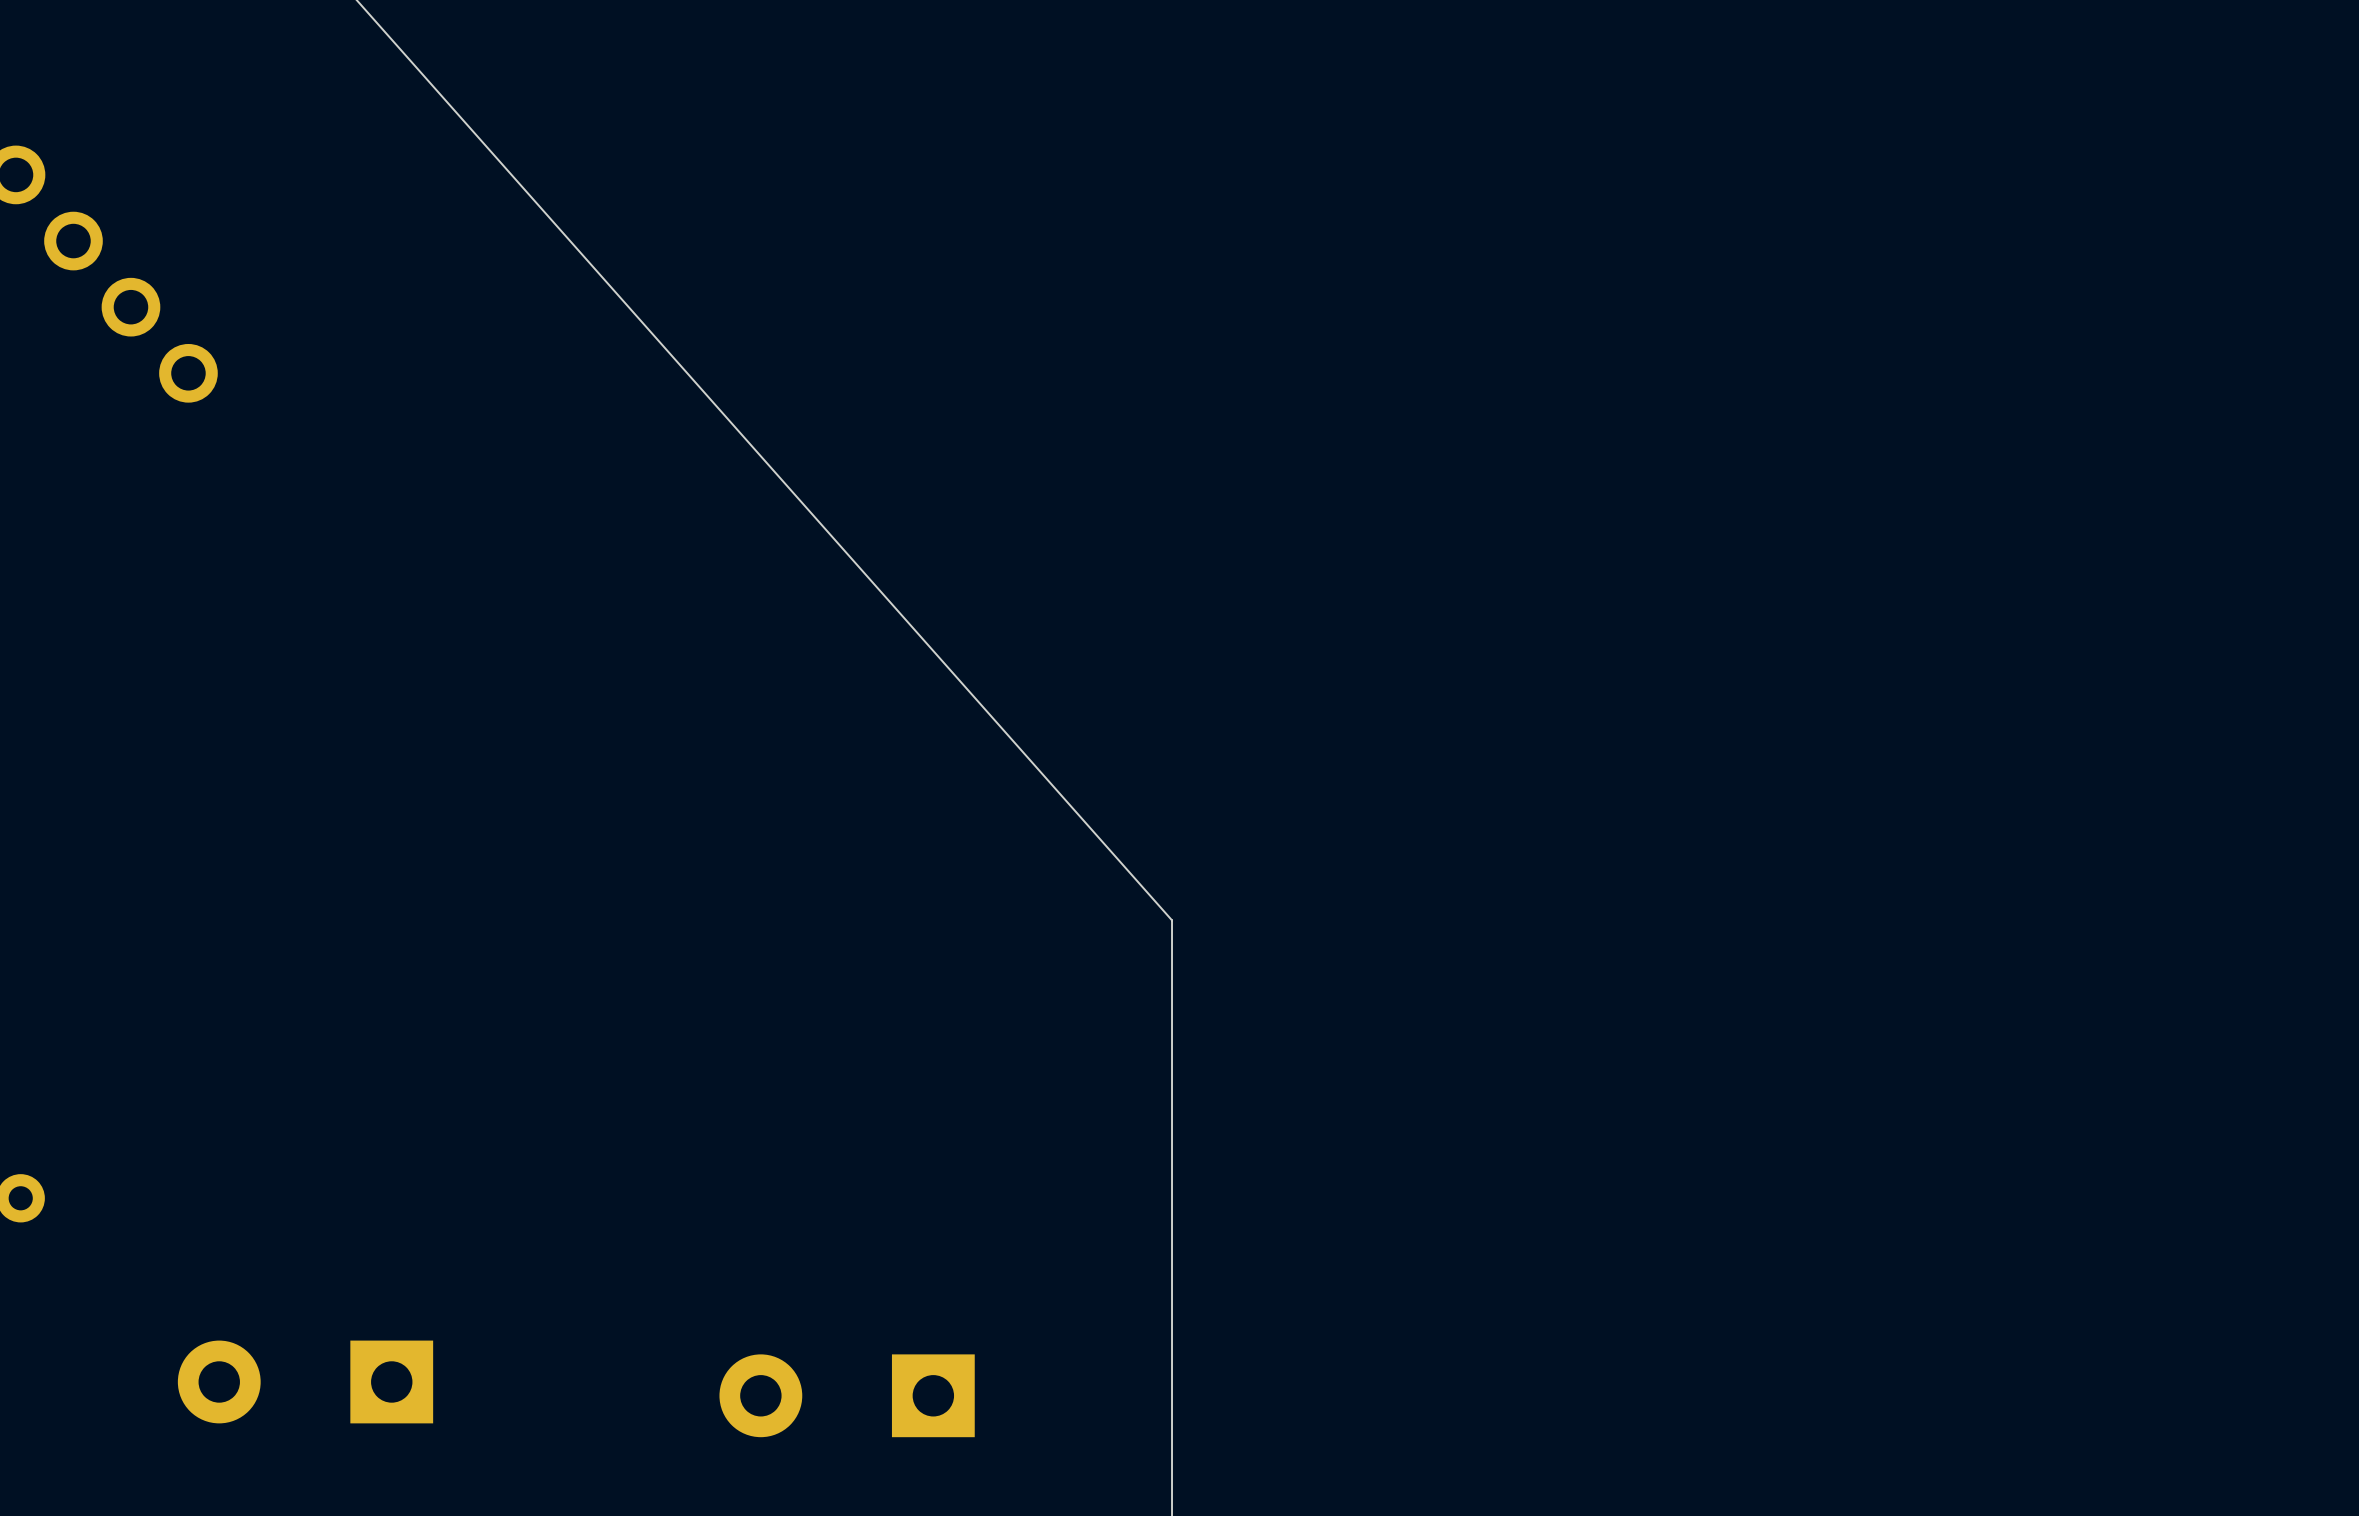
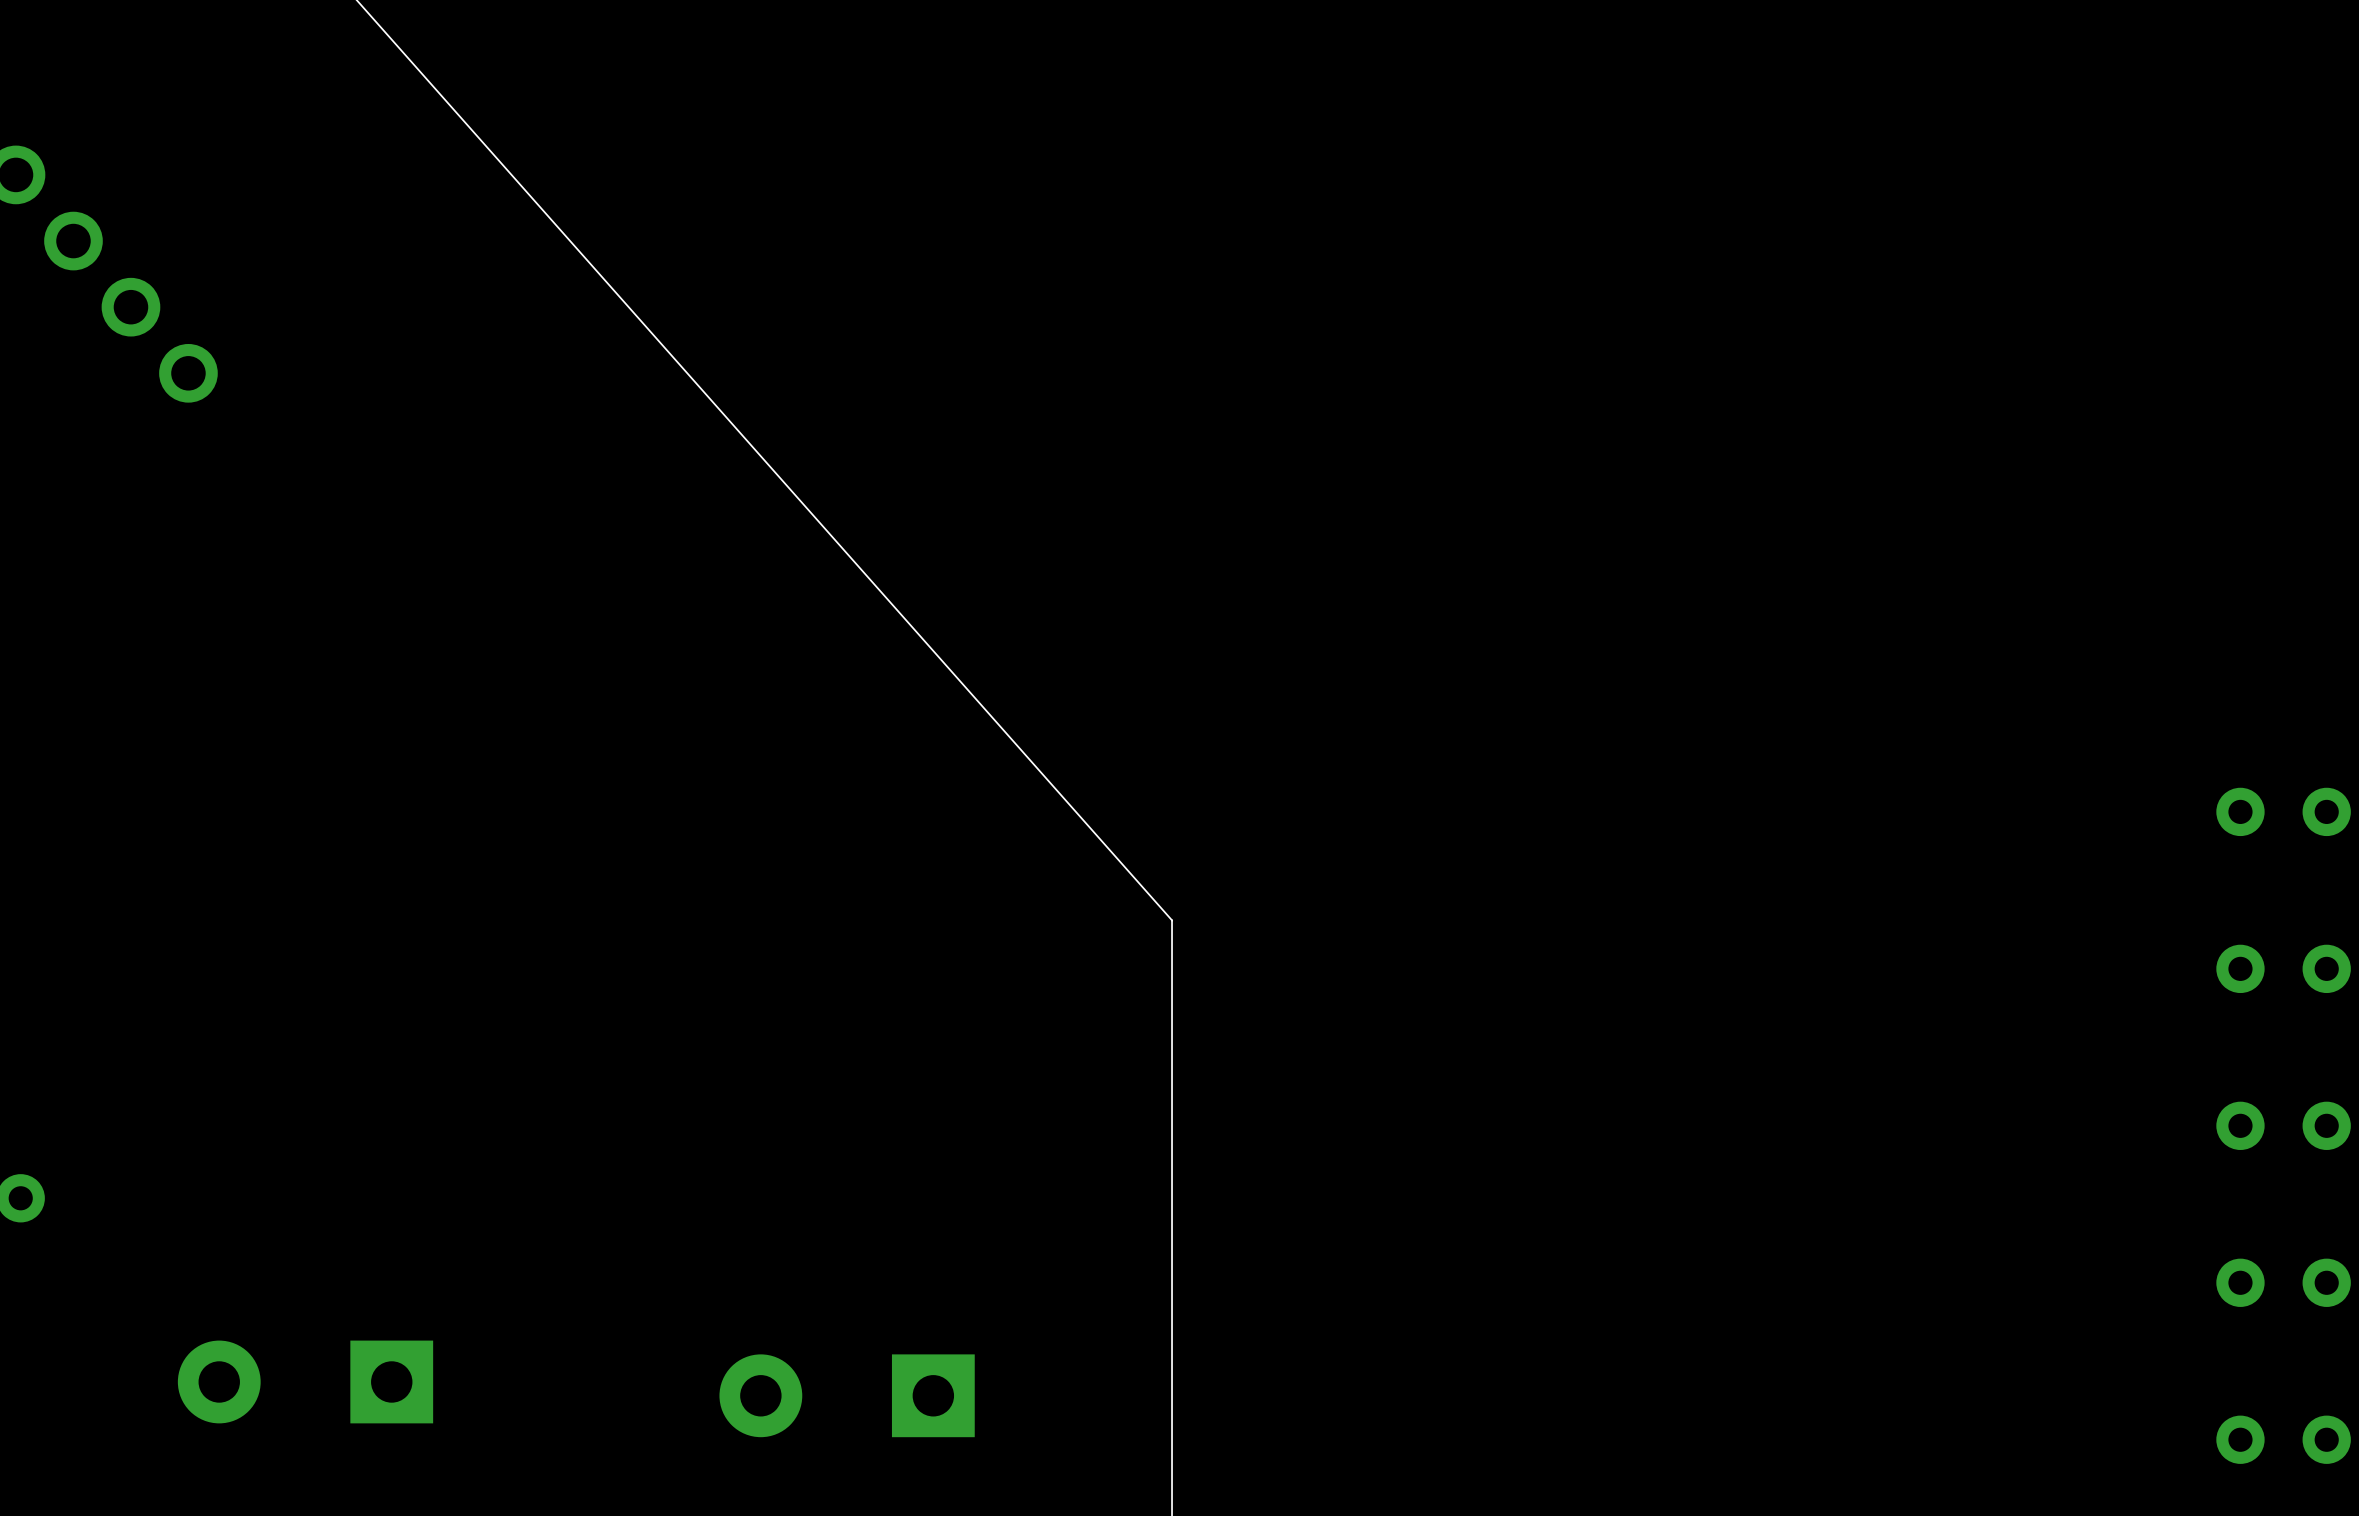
part: none -> (2283, 811)
part: none -> (2283, 968)
part: none -> (2283, 1125)
part: none -> (2283, 1282)
part: none -> (2283, 1439)

